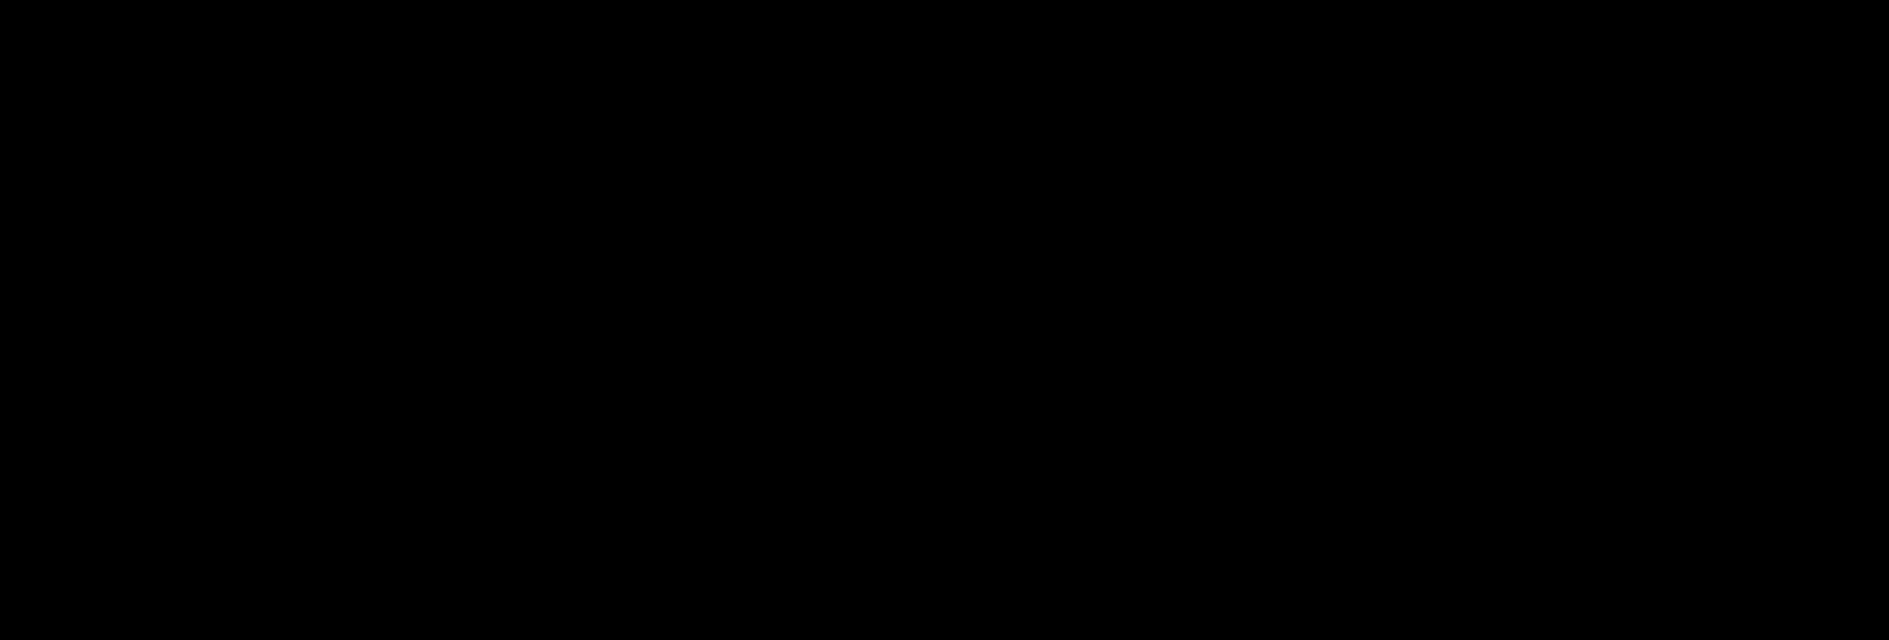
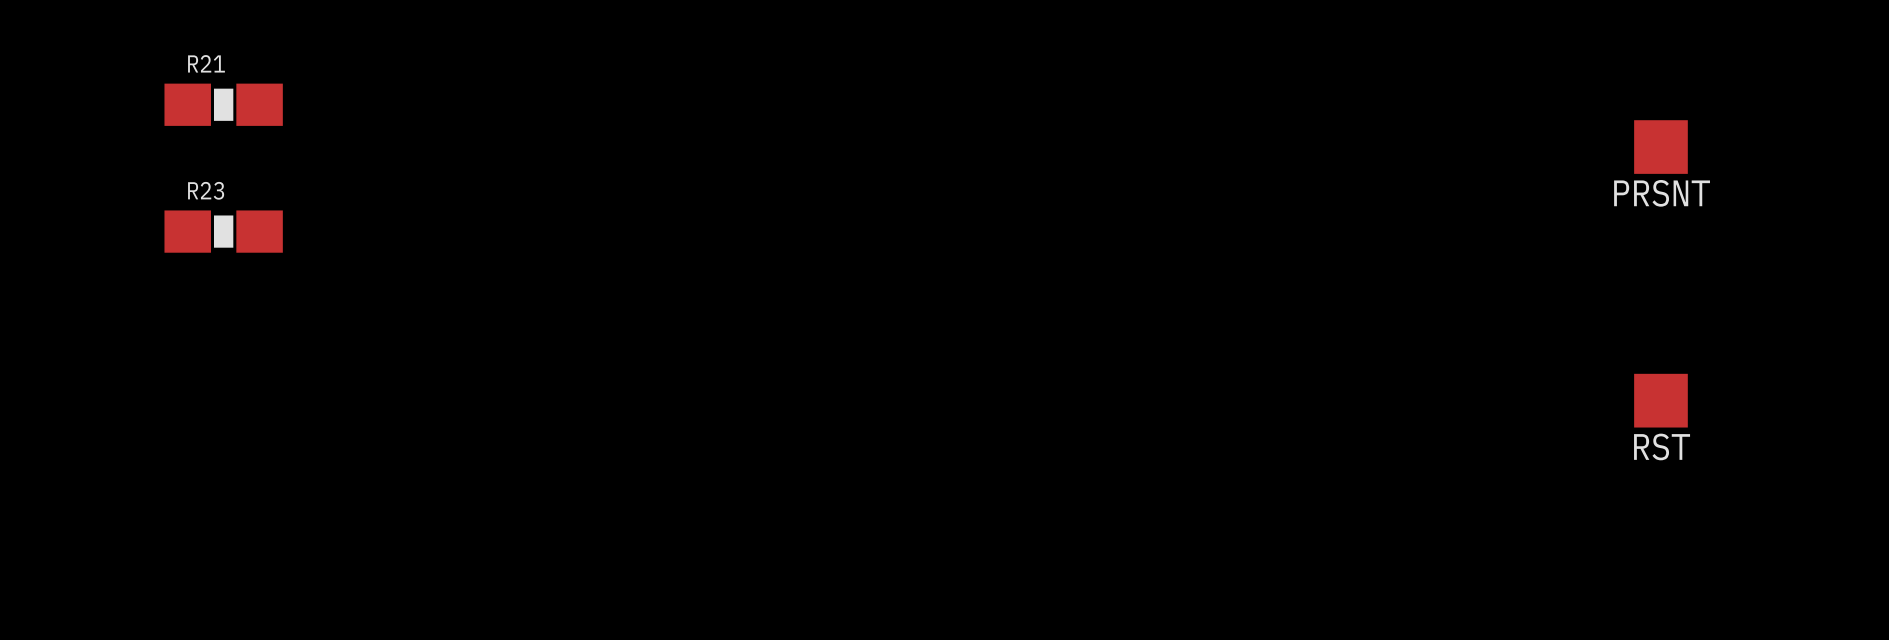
R21: none -> (223, 104)
part: none -> PRSNT (1660, 147)
R23: none -> (223, 231)
part: none -> RST (1660, 400)

